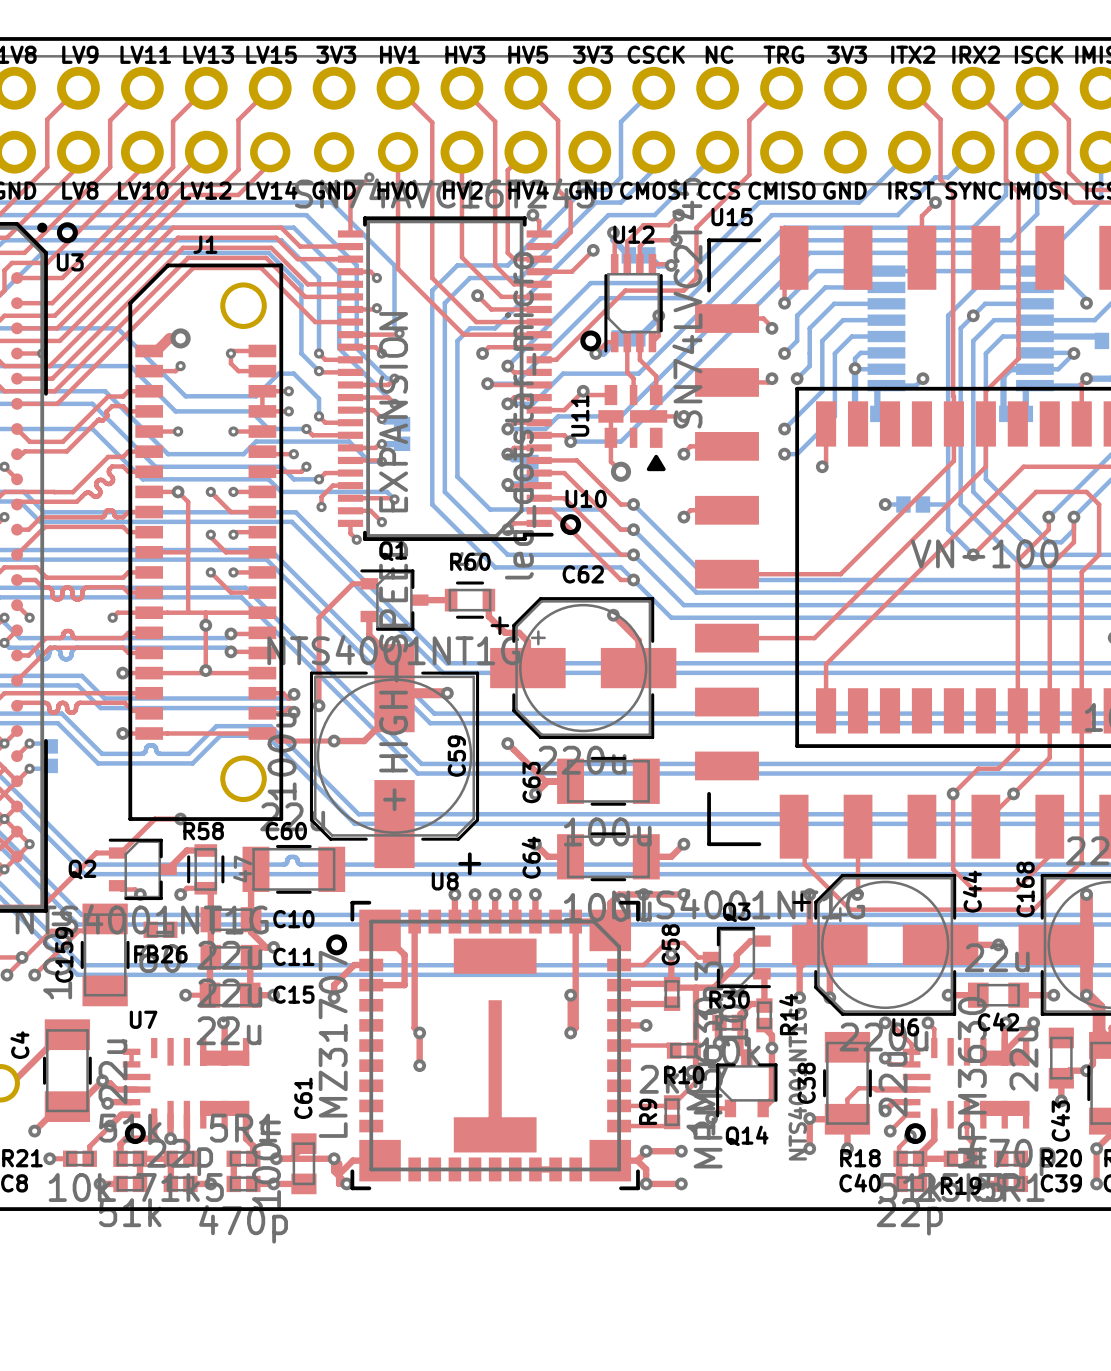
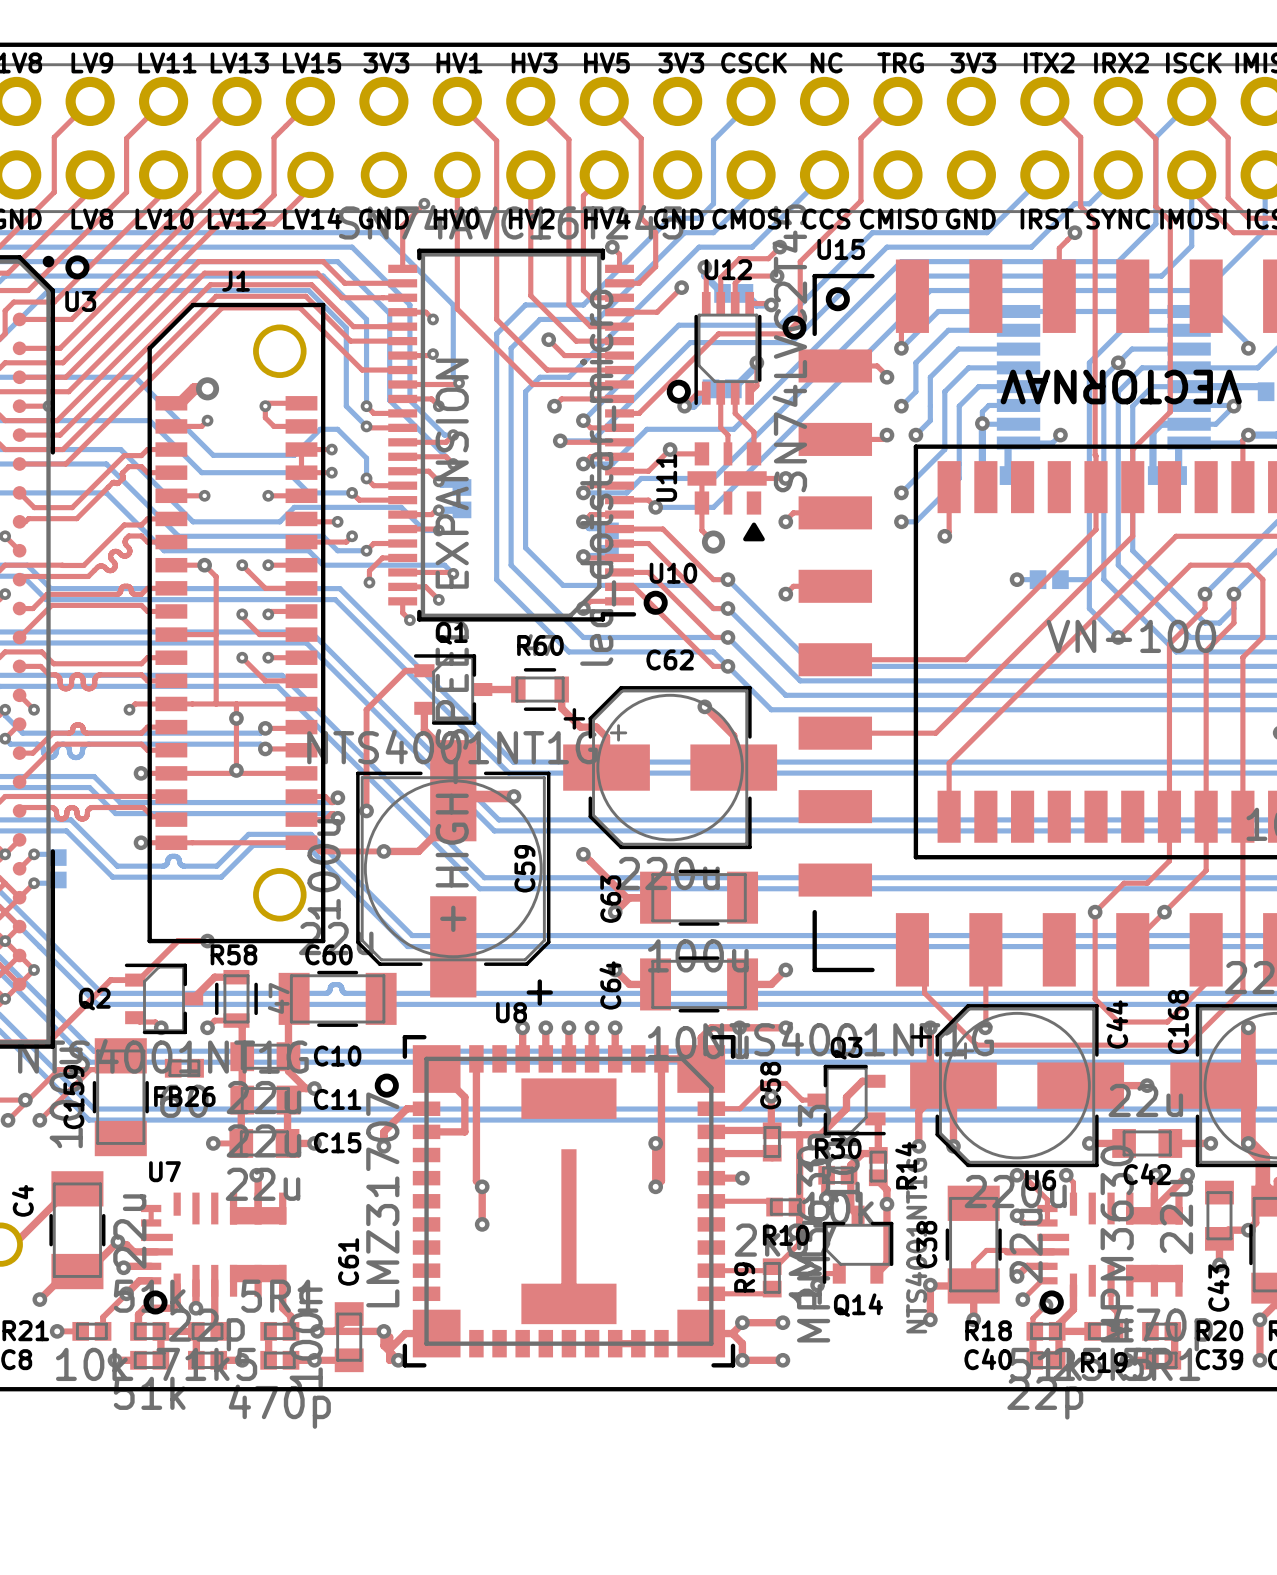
drawing: none -> [782, 287, 850, 340]
text: none -> VECTORNAV (1121, 387)

